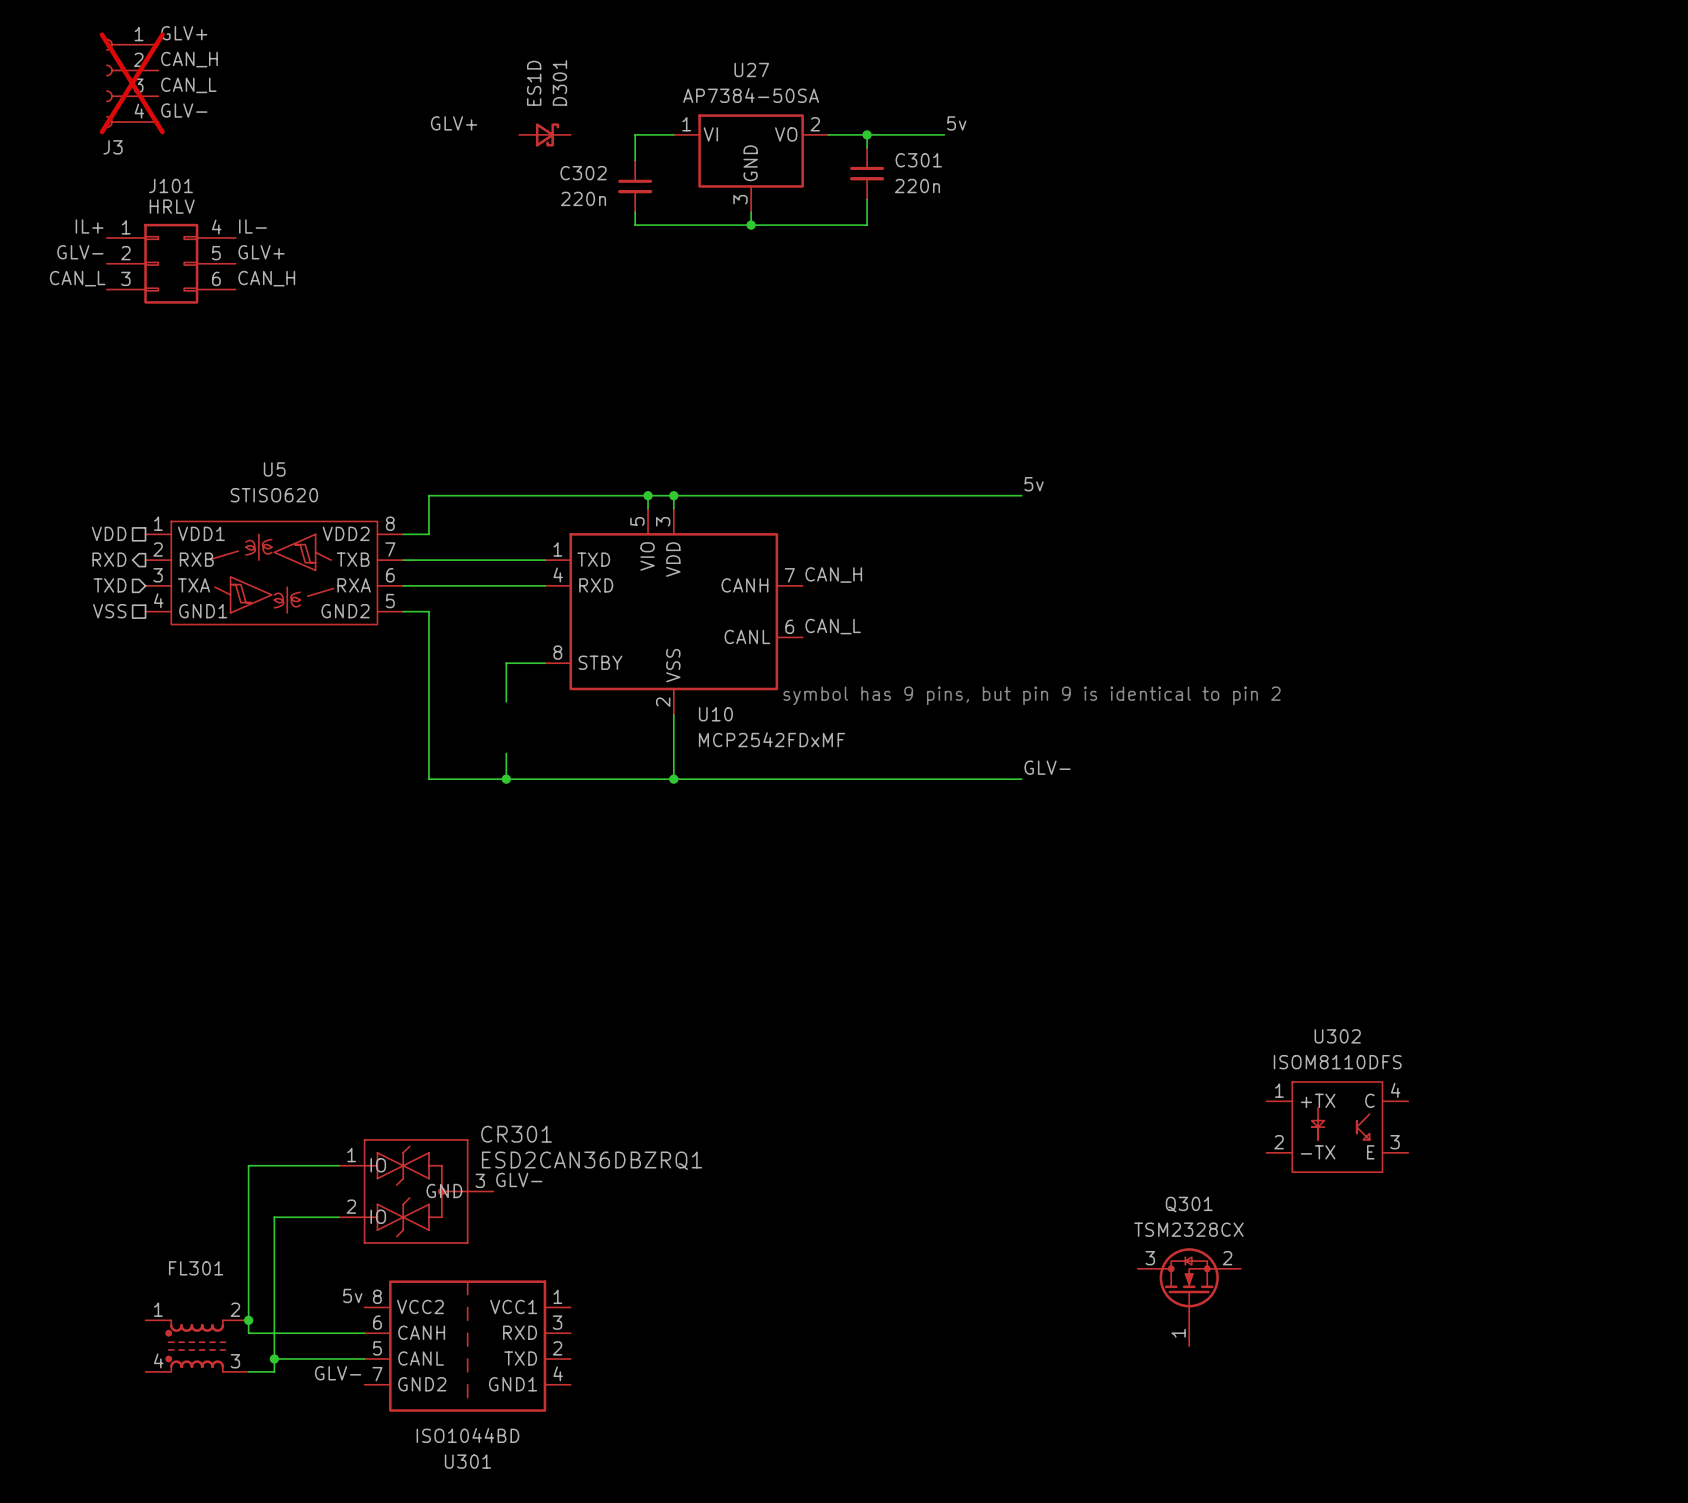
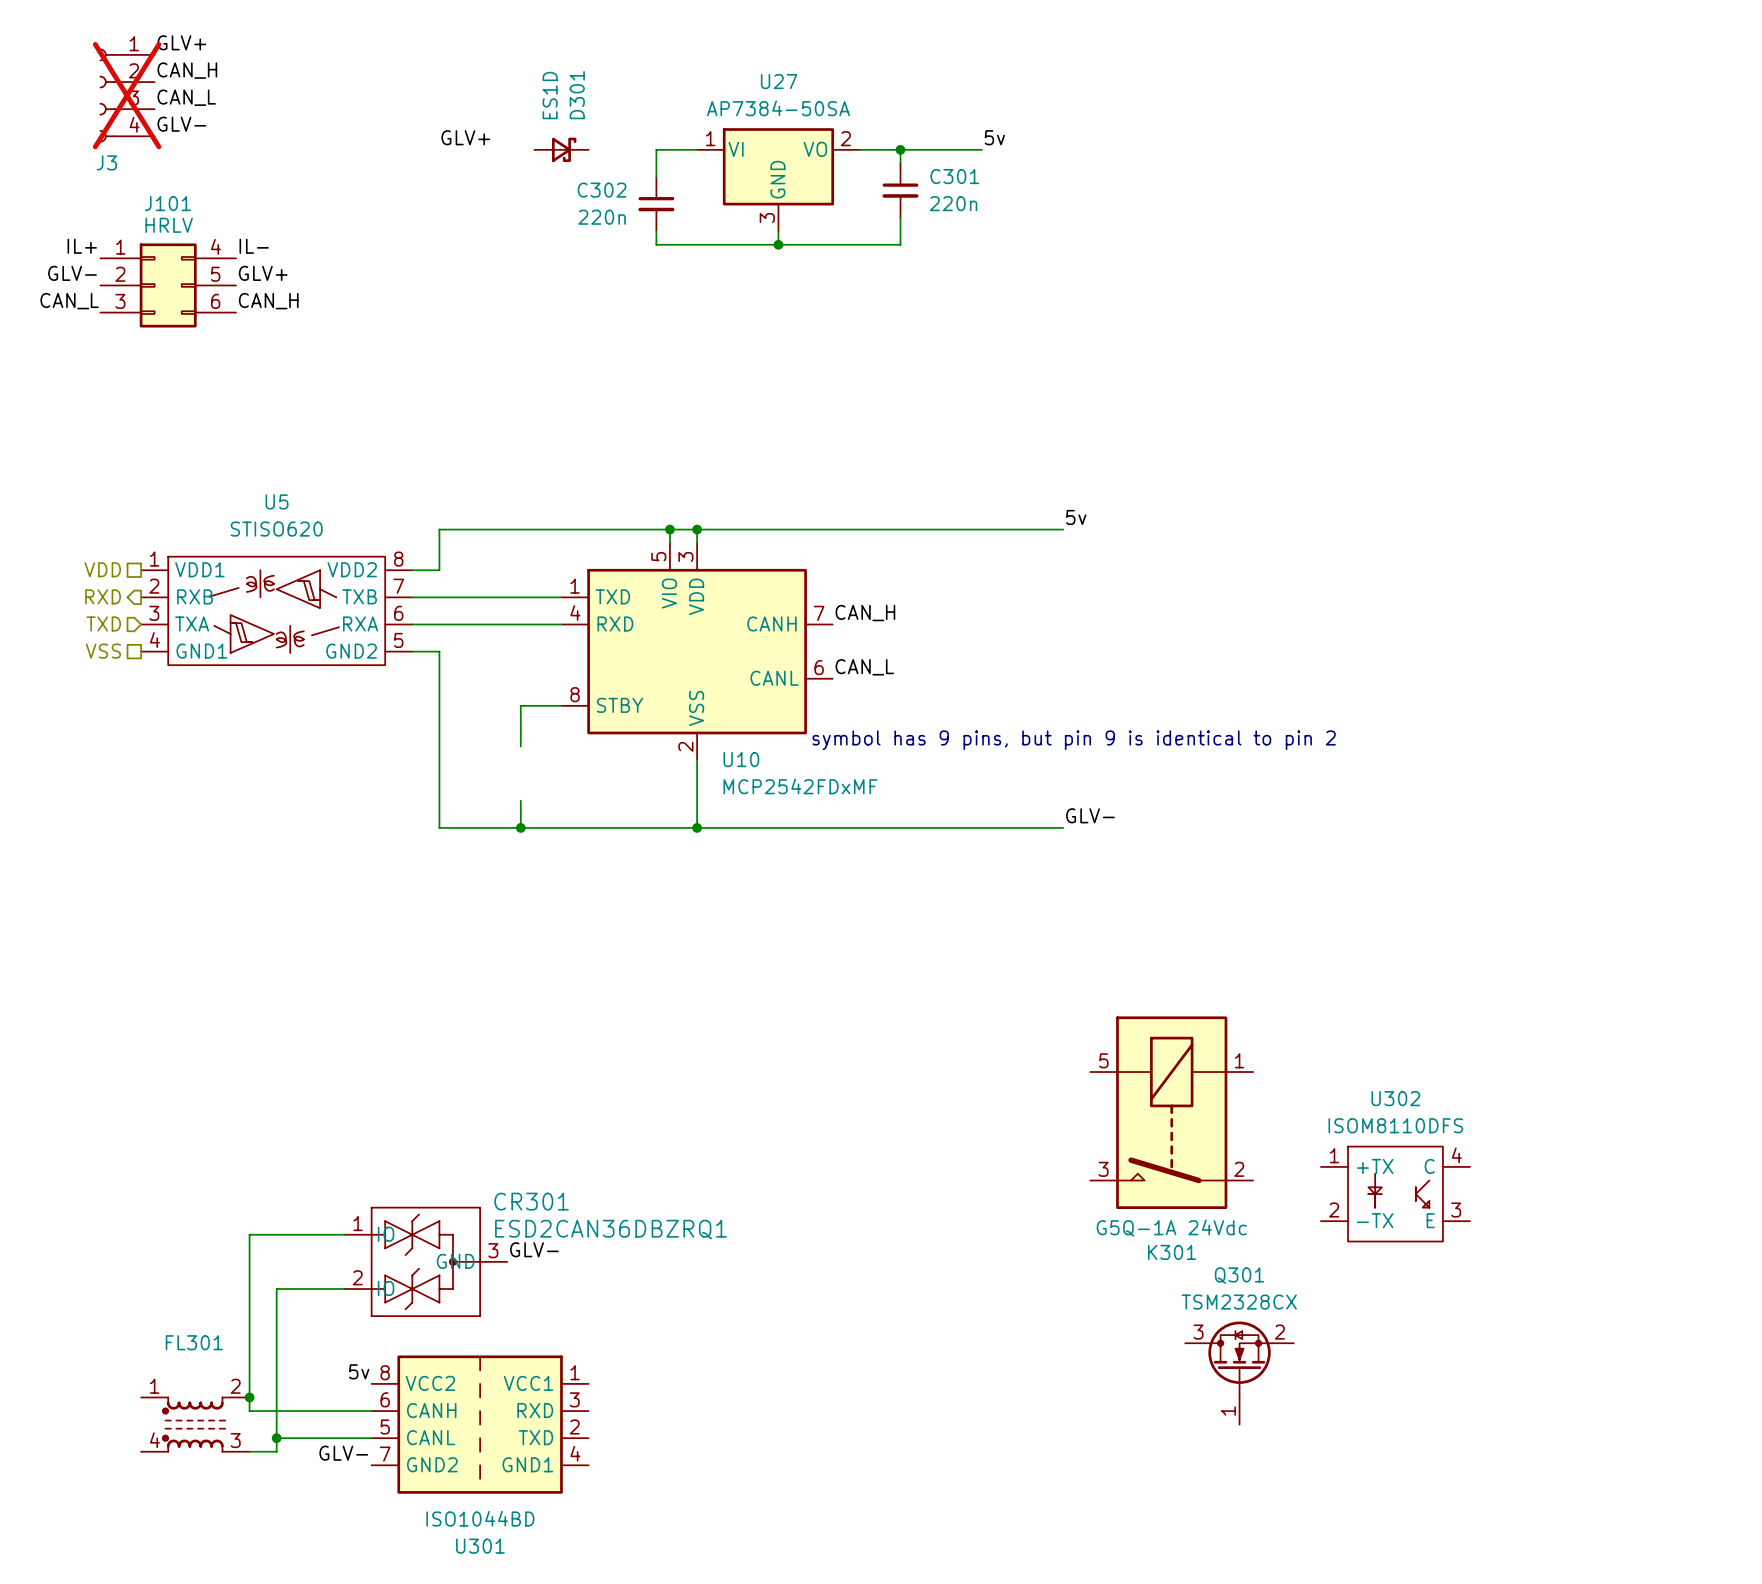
K301: none -> G5Q-1A 24Vdc (1171, 1112)

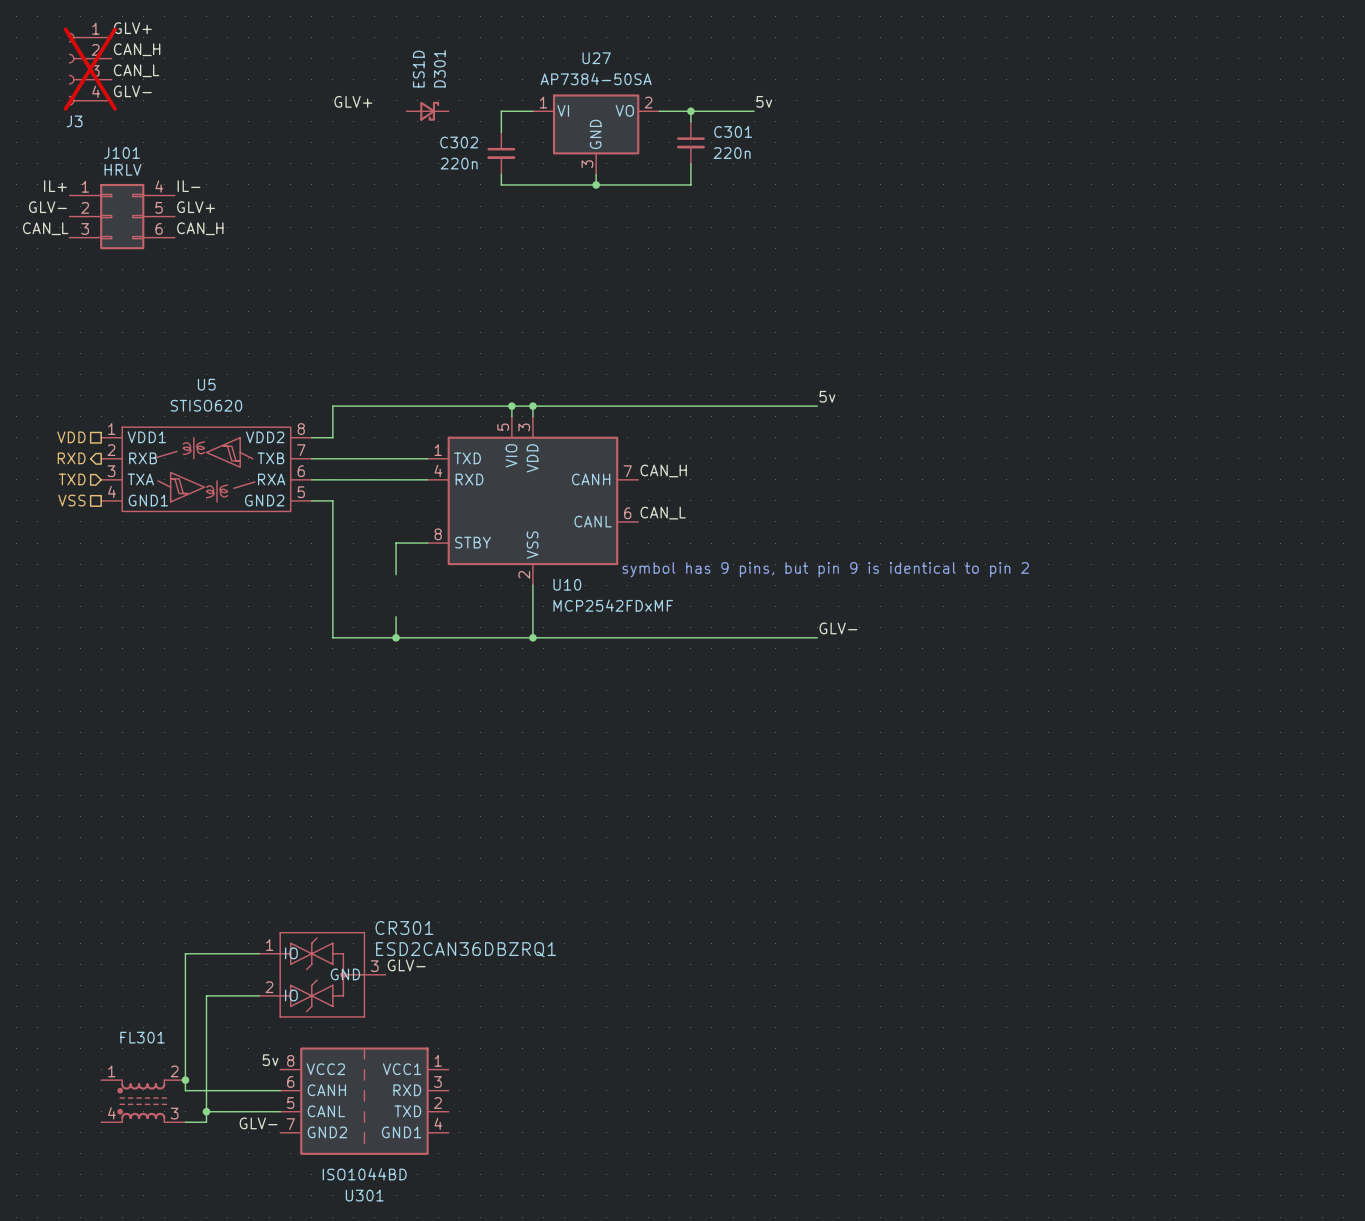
K301: G5Q-1A 24Vdc (1171, 1112) -> none
U302: ISOM8110DFS (1395, 1194) -> none
Q301: TSM2328CX (1239, 1373) -> none

